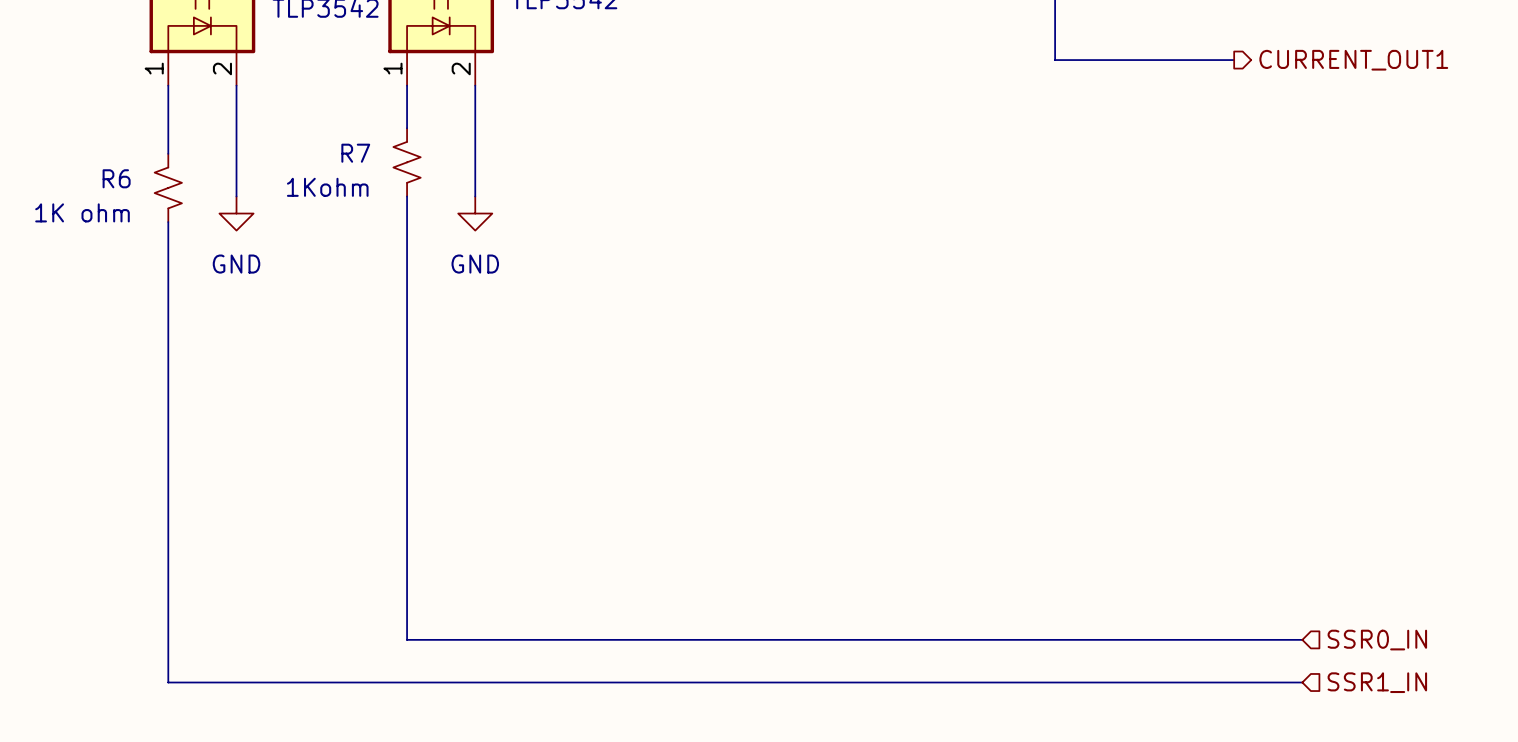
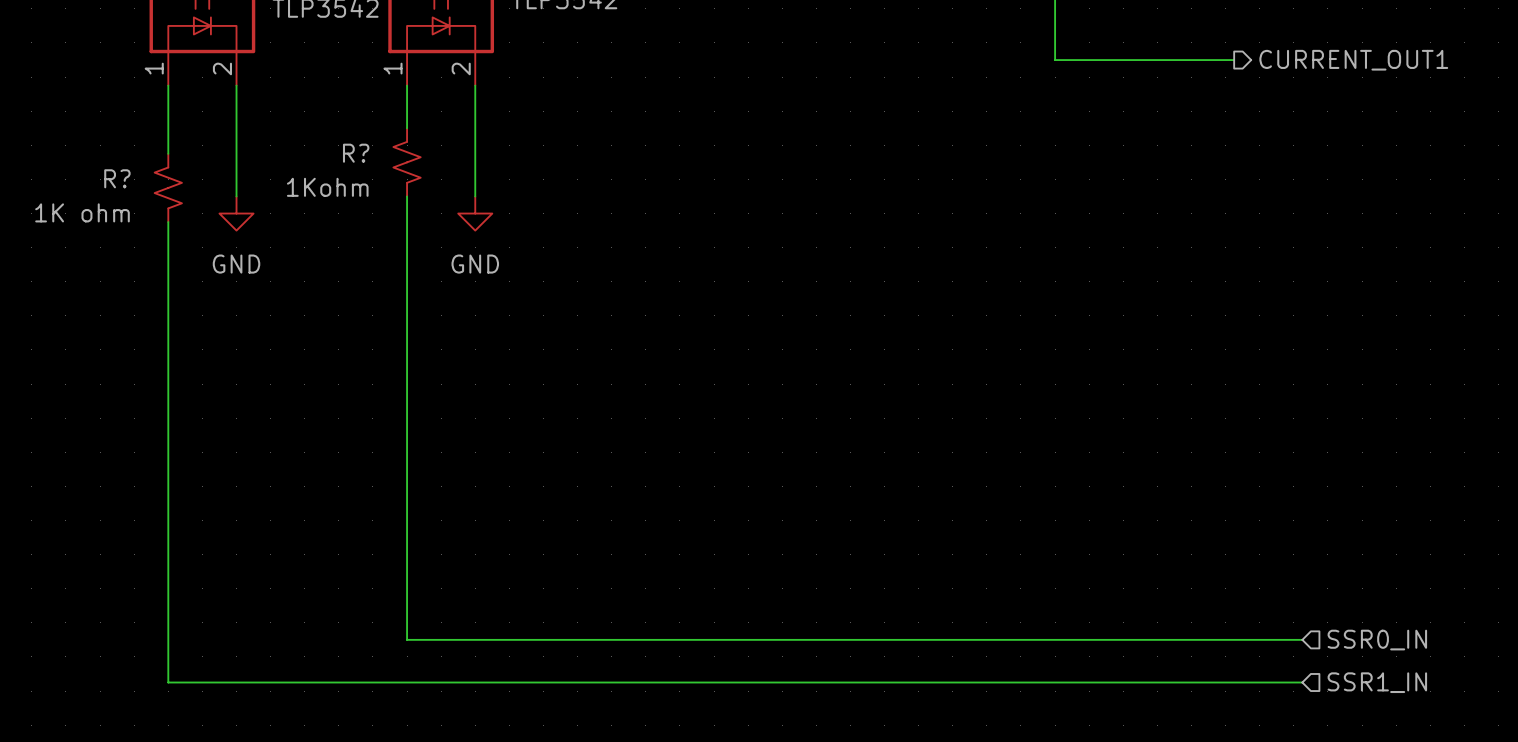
R7 name: R7 (355, 153) -> R? (356, 153)
R6 name: R6 (116, 178) -> R? (117, 178)

